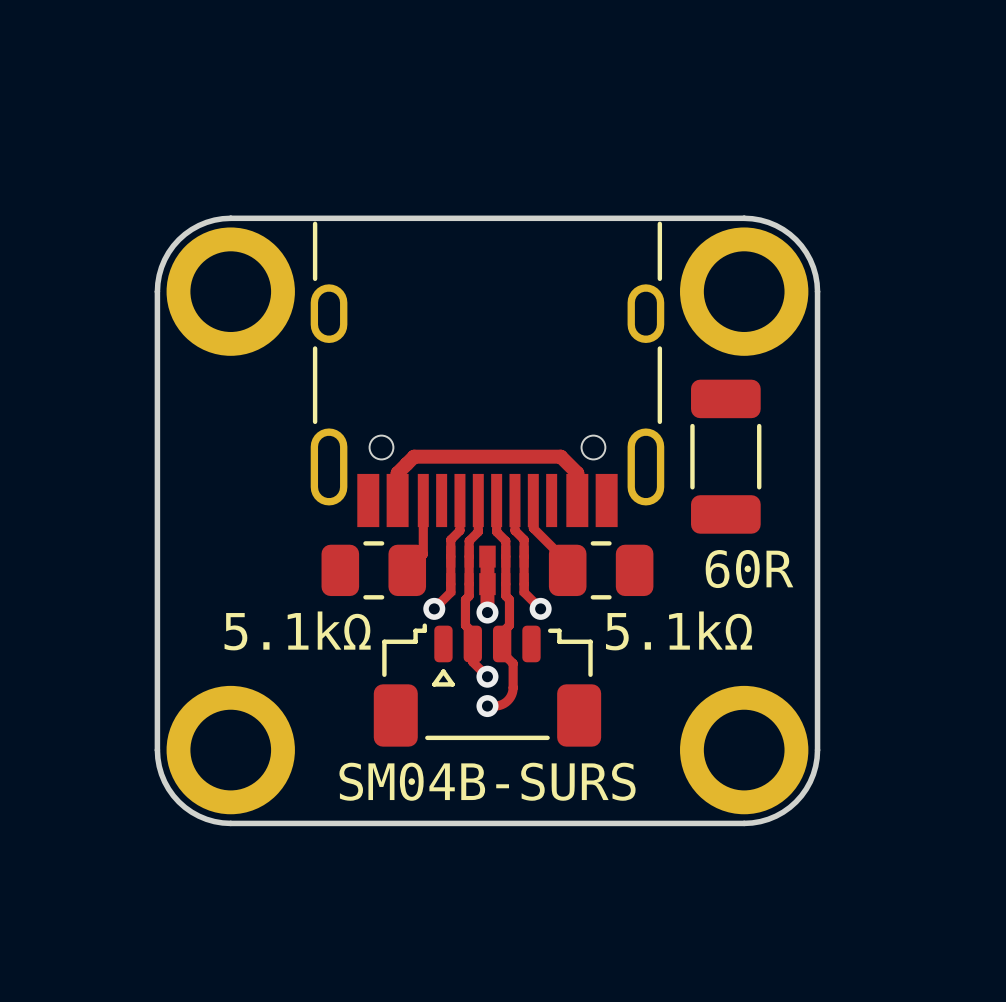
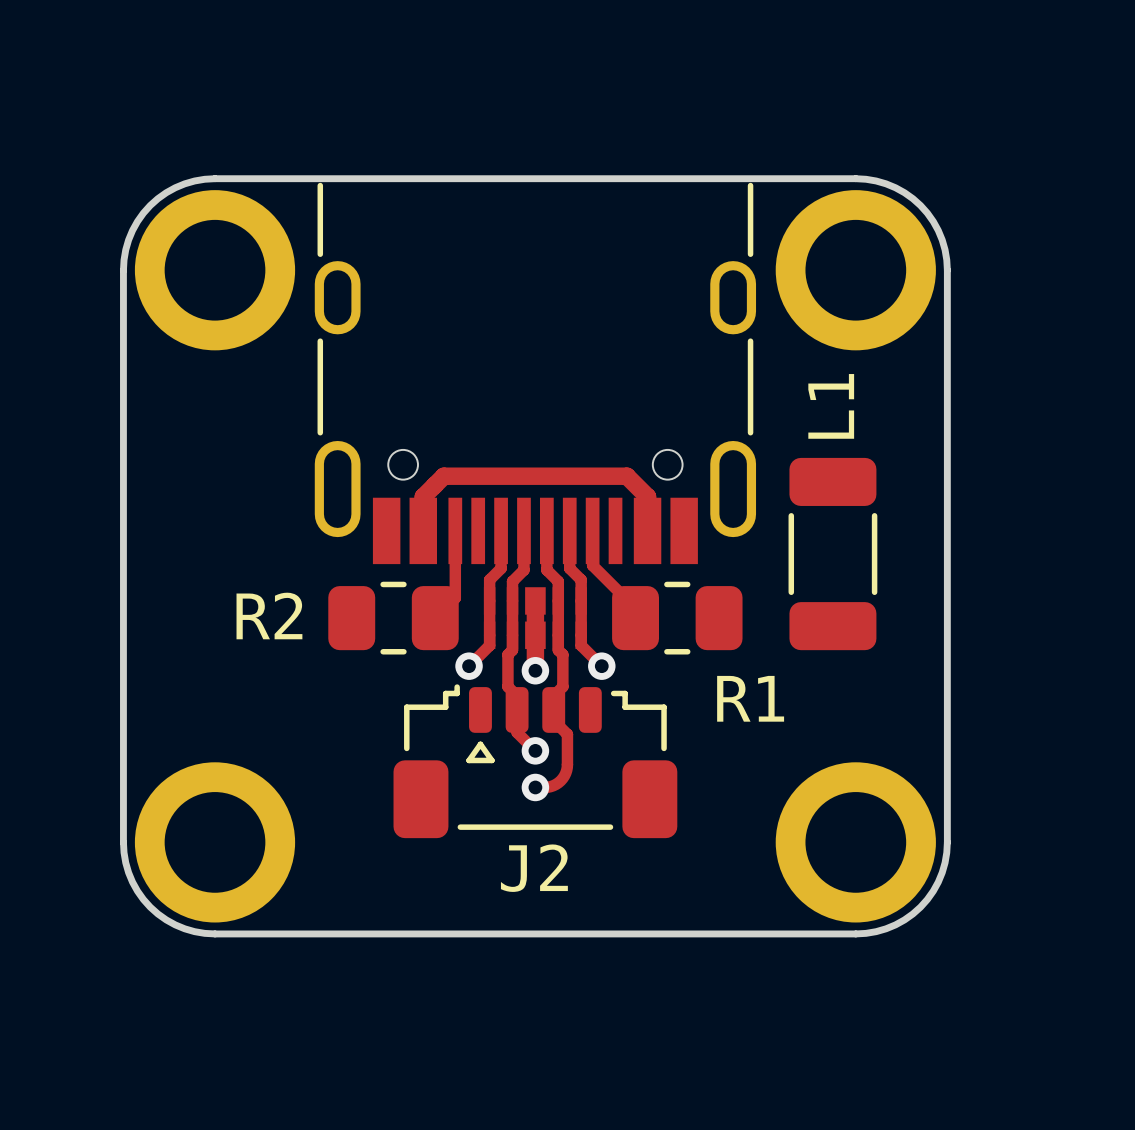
part: 60R (725, 456) -> none
L1: none -> (832, 554)
R2 name: none -> R2 (269, 615)
R2 value: 5.1kΩ (297, 630) -> none
R1 value: 5.1kΩ (679, 630) -> none
R1 name: none -> R1 (750, 698)
J2 name: none -> J2 (534, 868)
J2 value: SM04B-SURS (487, 781) -> none

